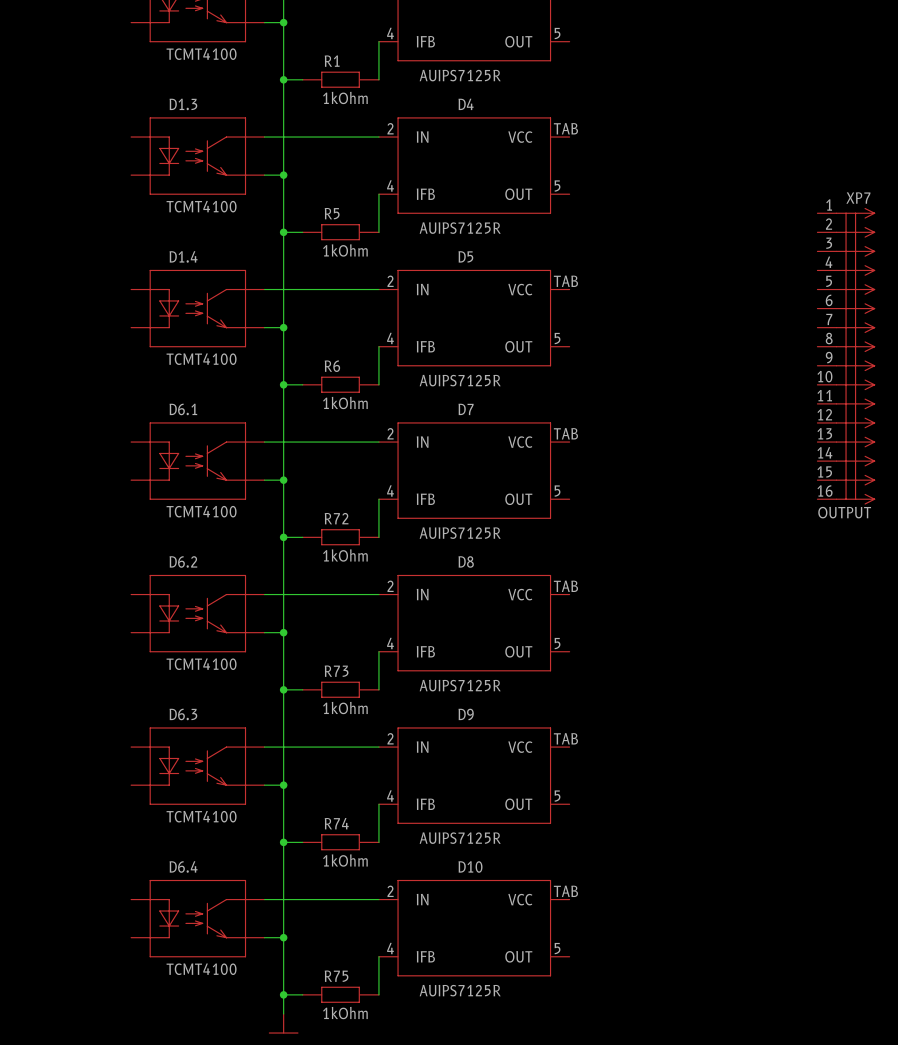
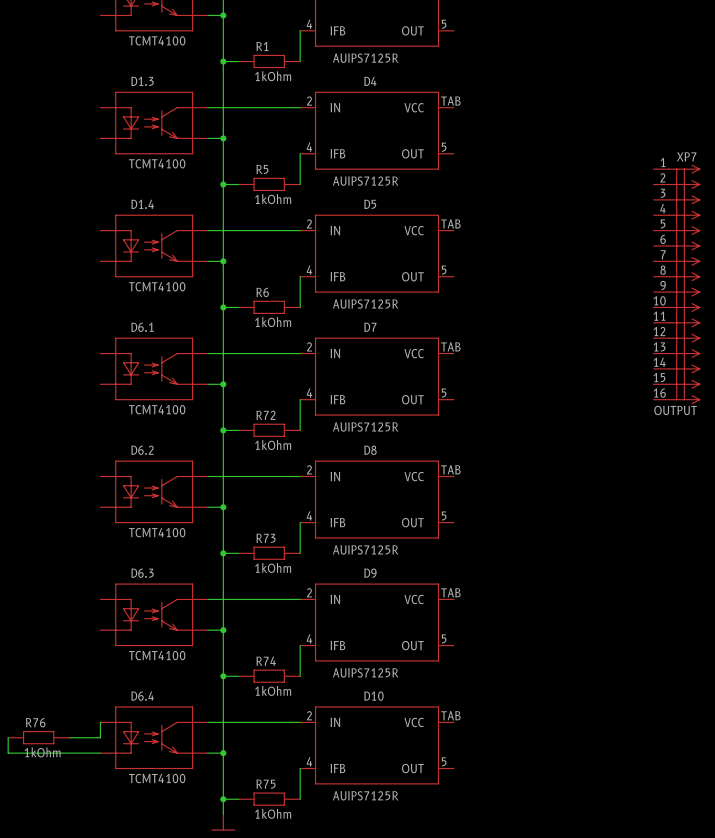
wire: none -> (100, 722) (100, 737) (69, 737)
wire: none -> (8, 737) (8, 753) (100, 753)
R76: none -> 1kOhm (38, 737)

